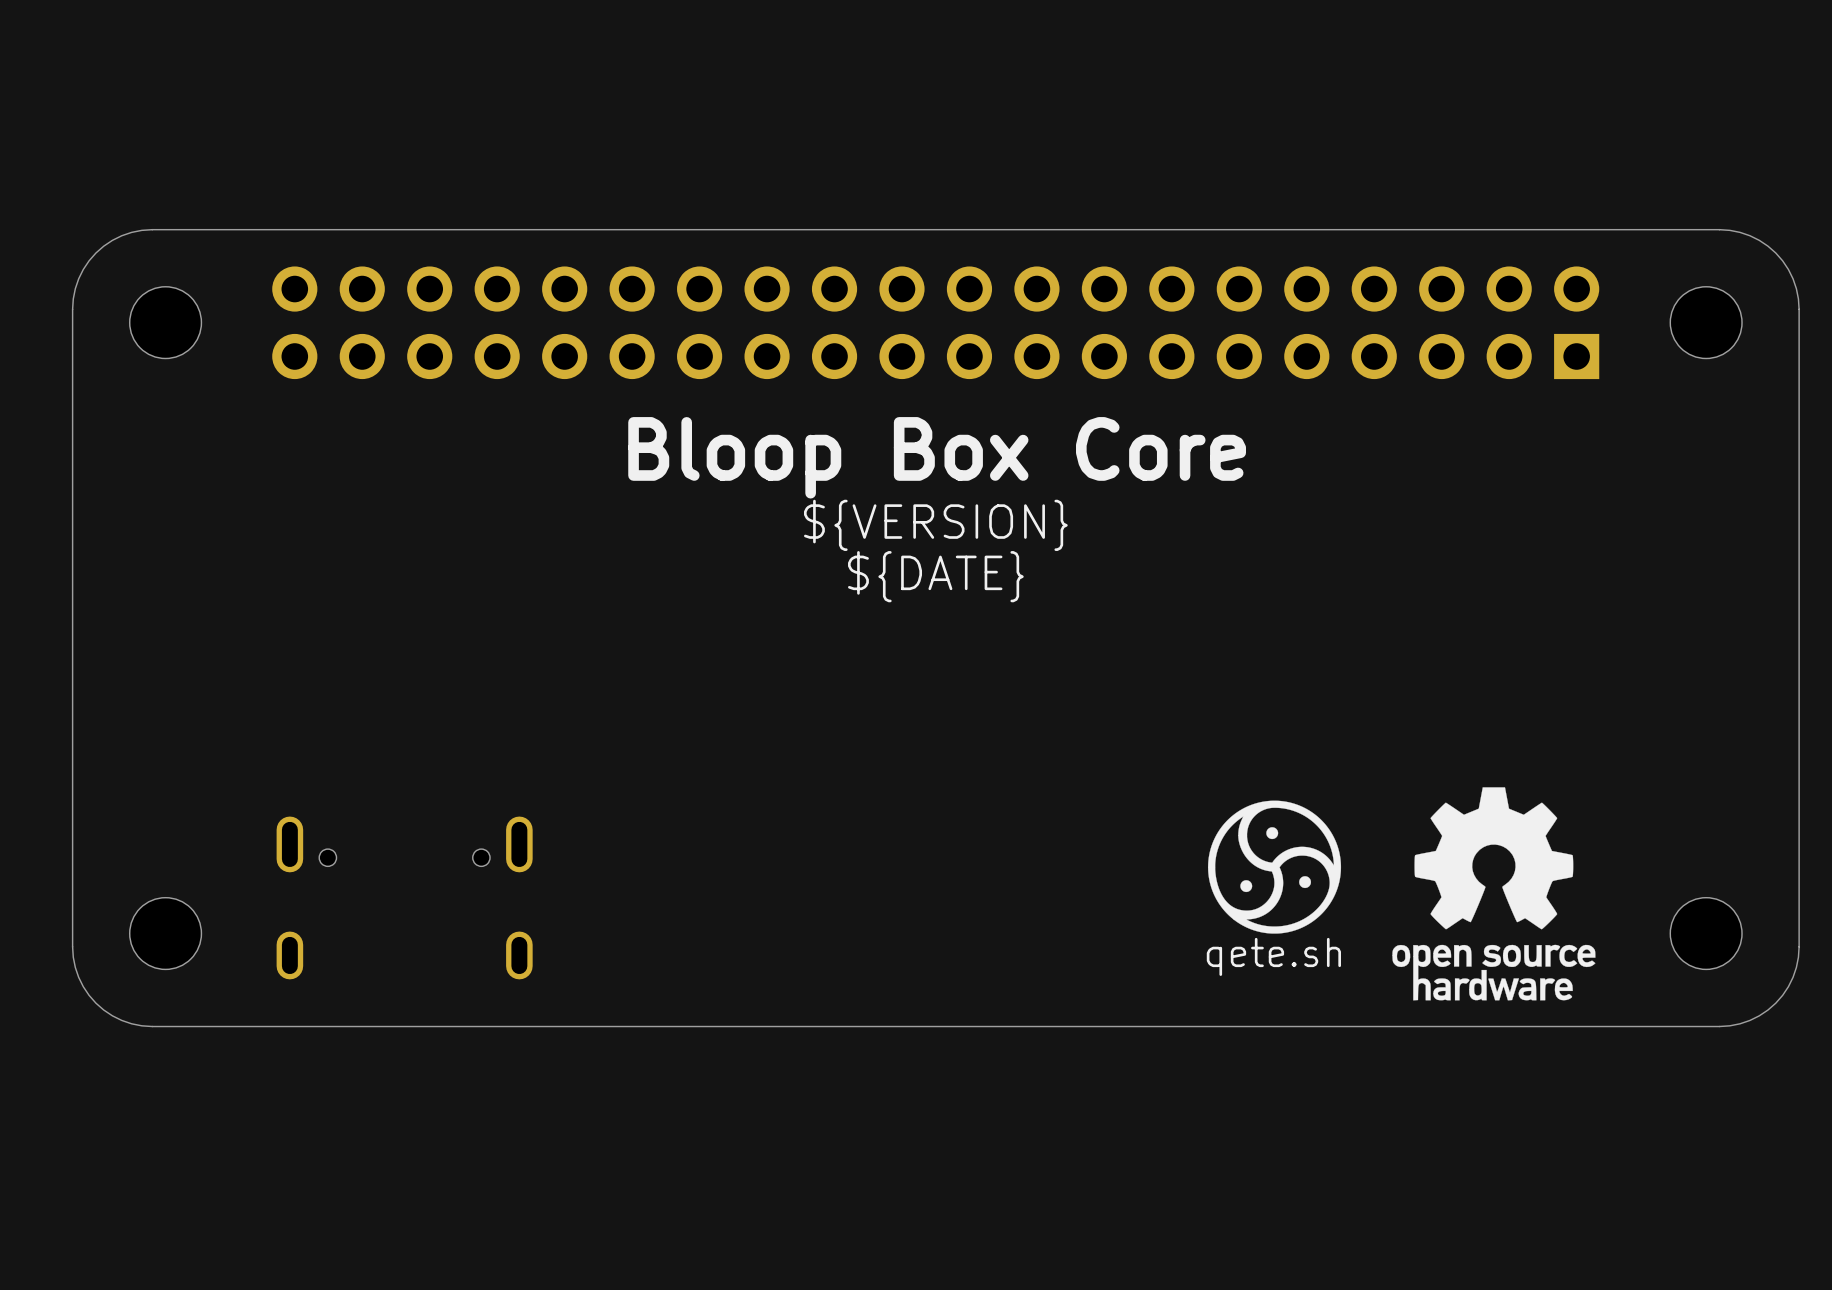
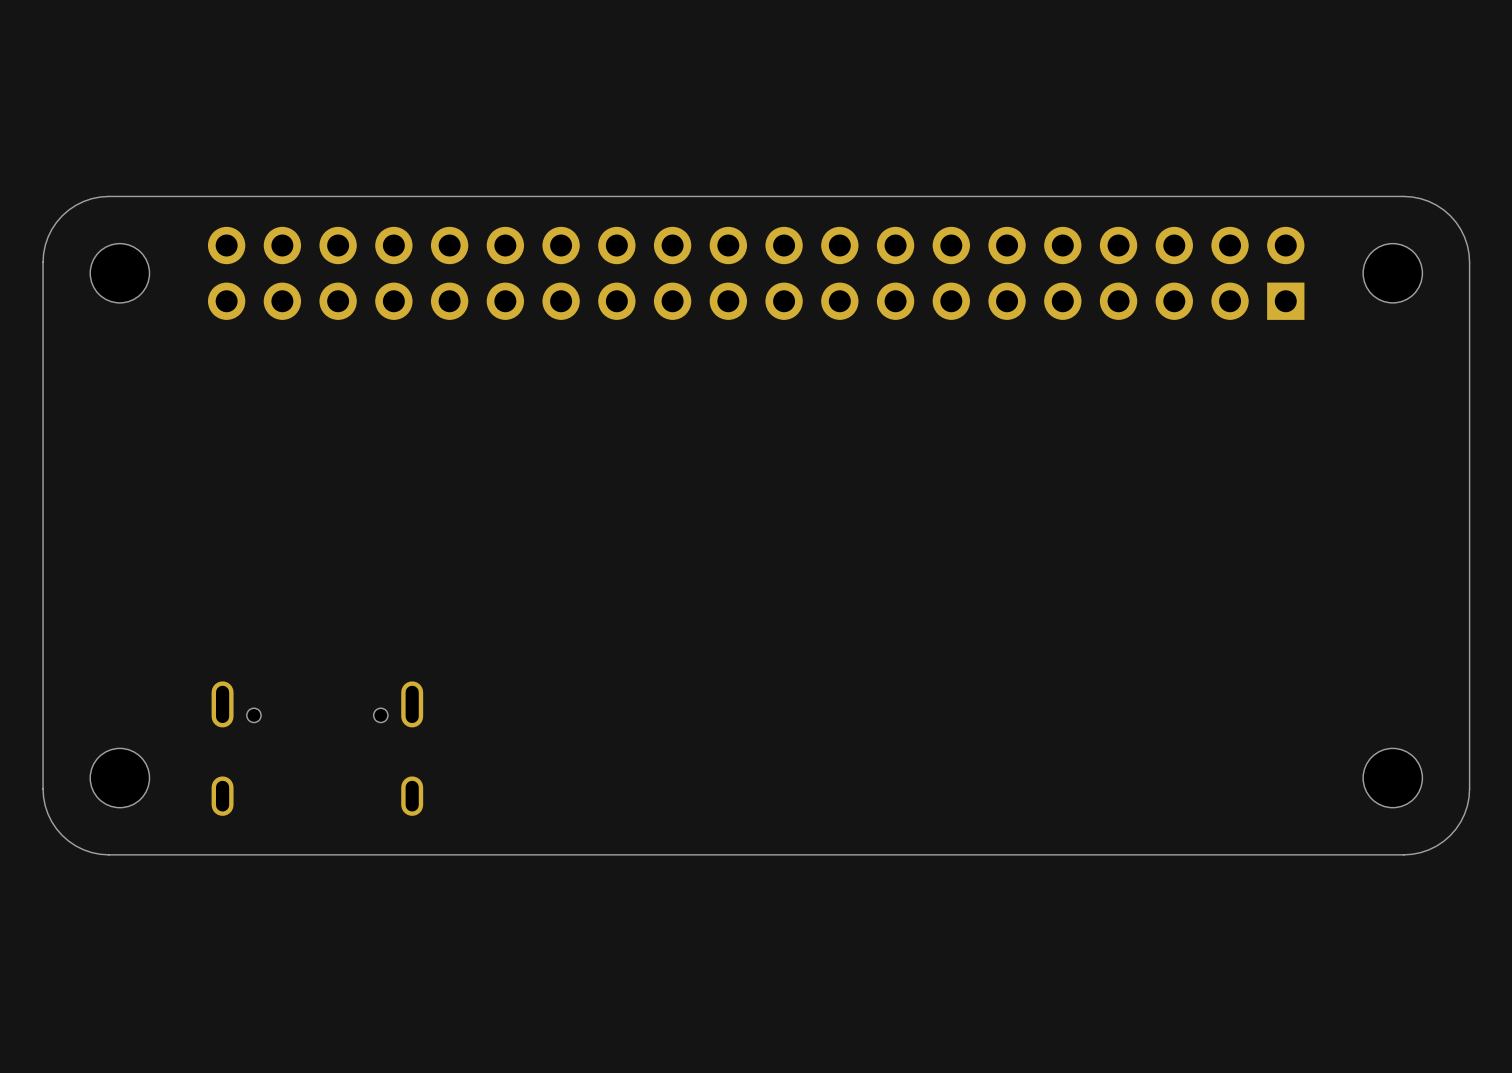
text: Bloop Box Core (937, 457) -> none
text: ${VERSION} (935, 525) -> none
text: ${DATE} (935, 576) -> none
drawing: [1392, 787, 1596, 1001] -> none
drawing: [1208, 800, 1342, 934] -> none
text: qete.sh (1273, 956) -> none

